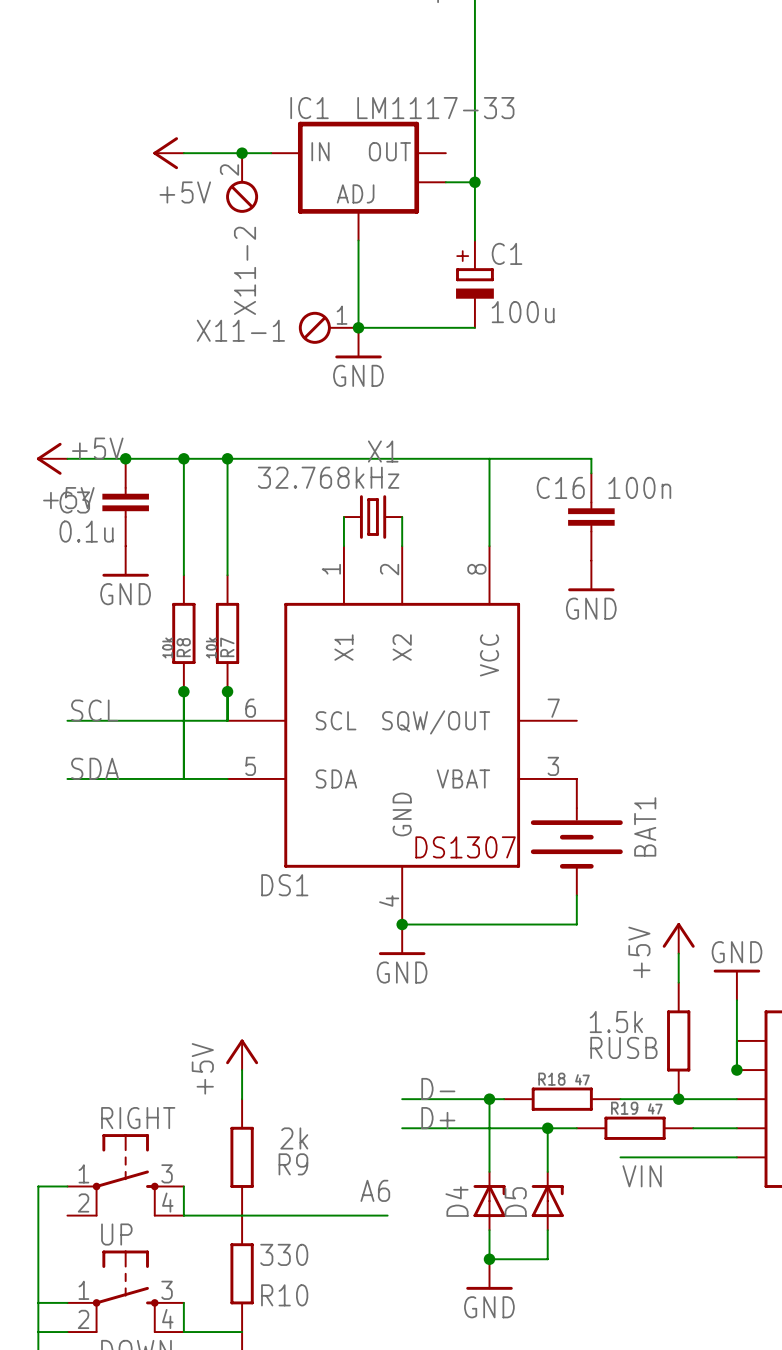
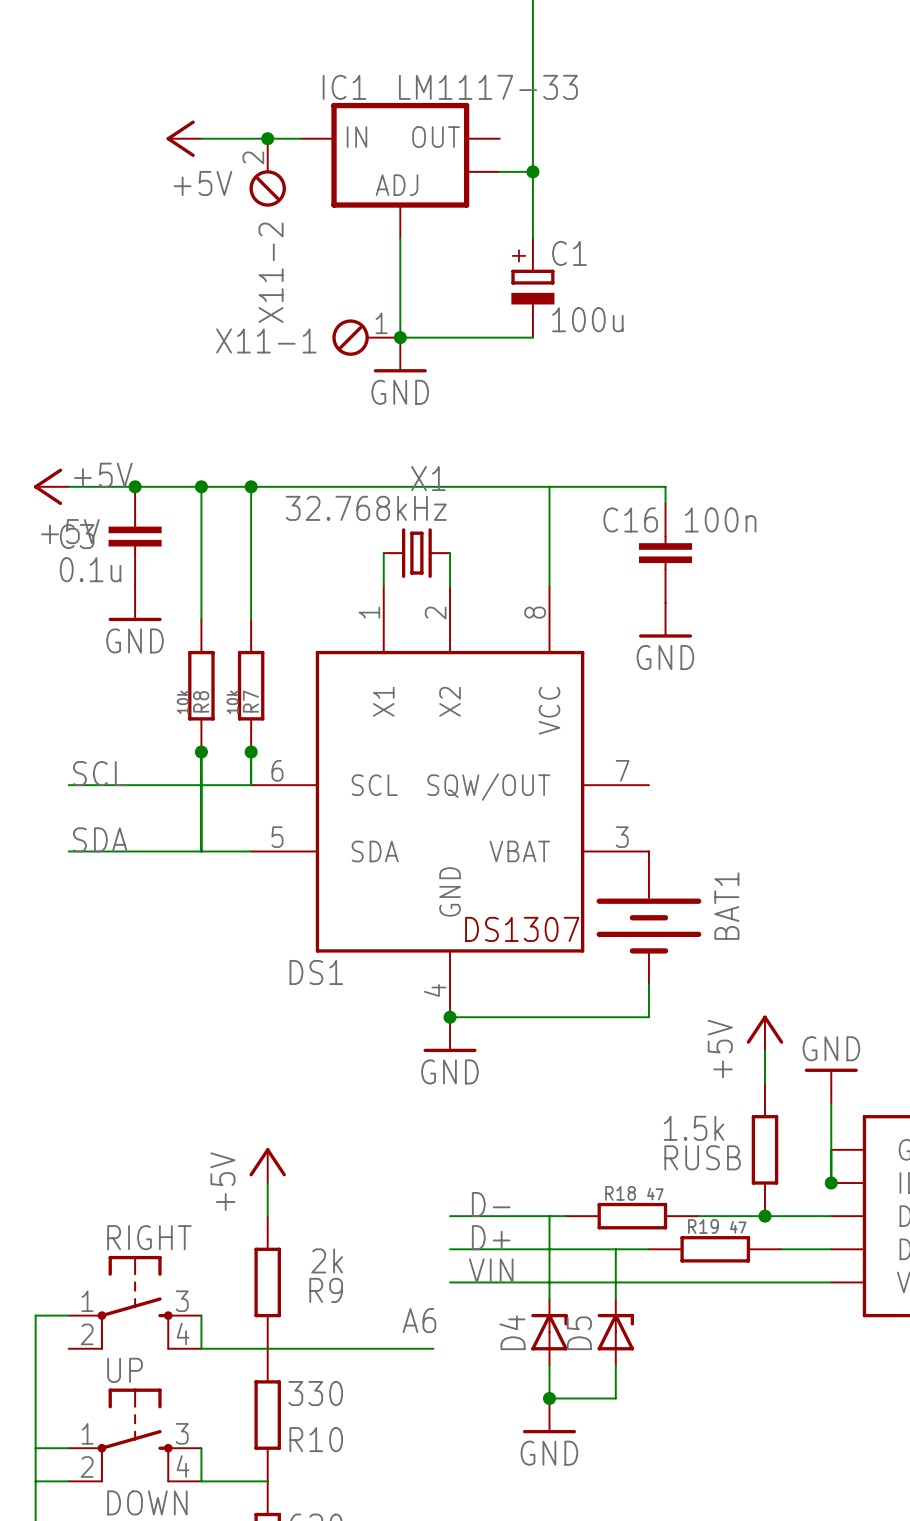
junction: (489, 1099) -> none
junction: (547, 1128) -> none
wire: none -> (450, 1282) (698, 1282)
label position: VIN (642, 1176) -> VIN (491, 1270)

